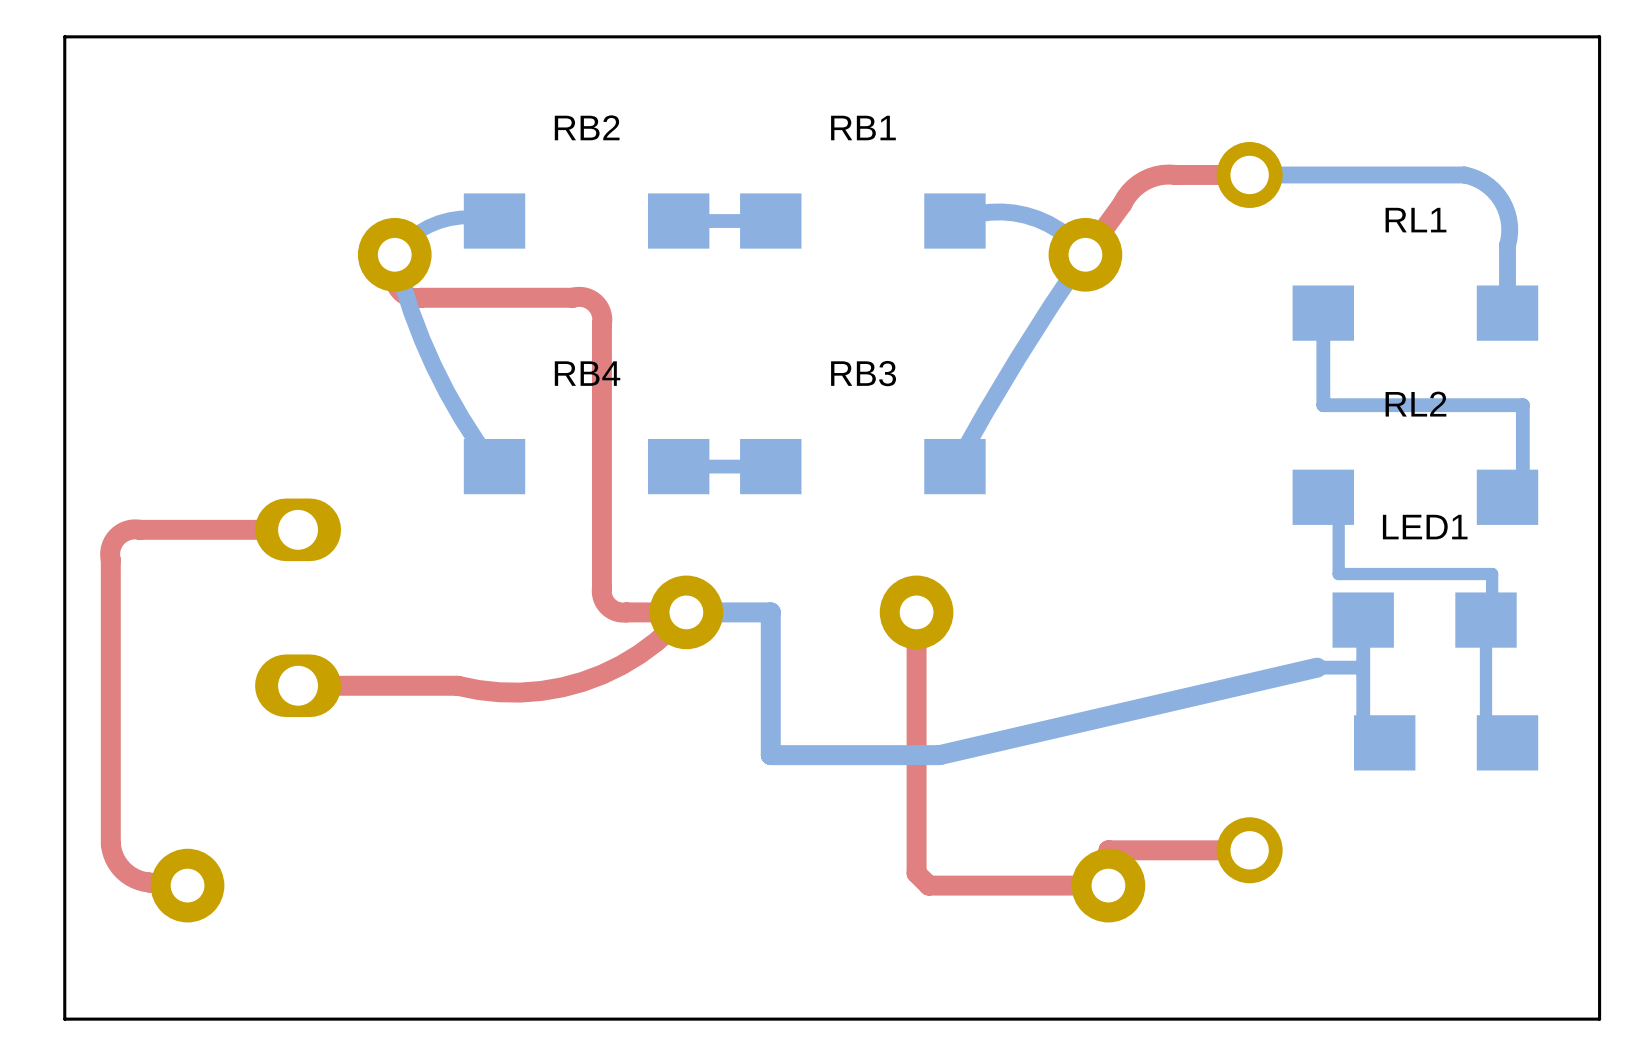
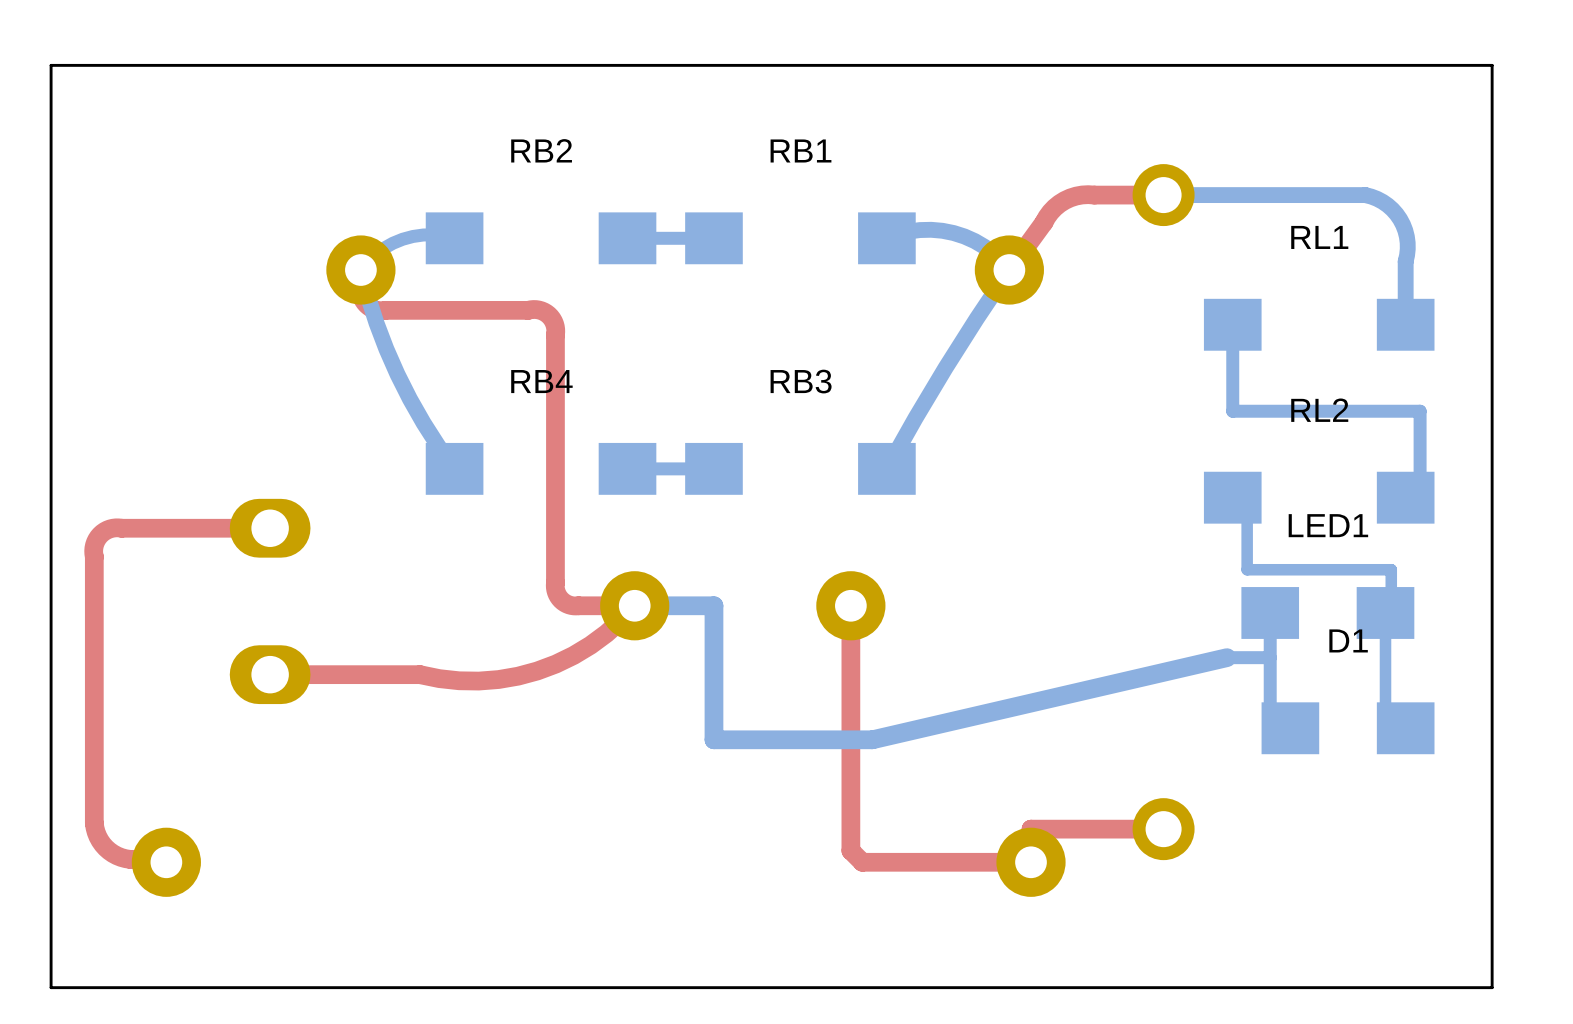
D1 name: none -> D1 (1348, 640)

